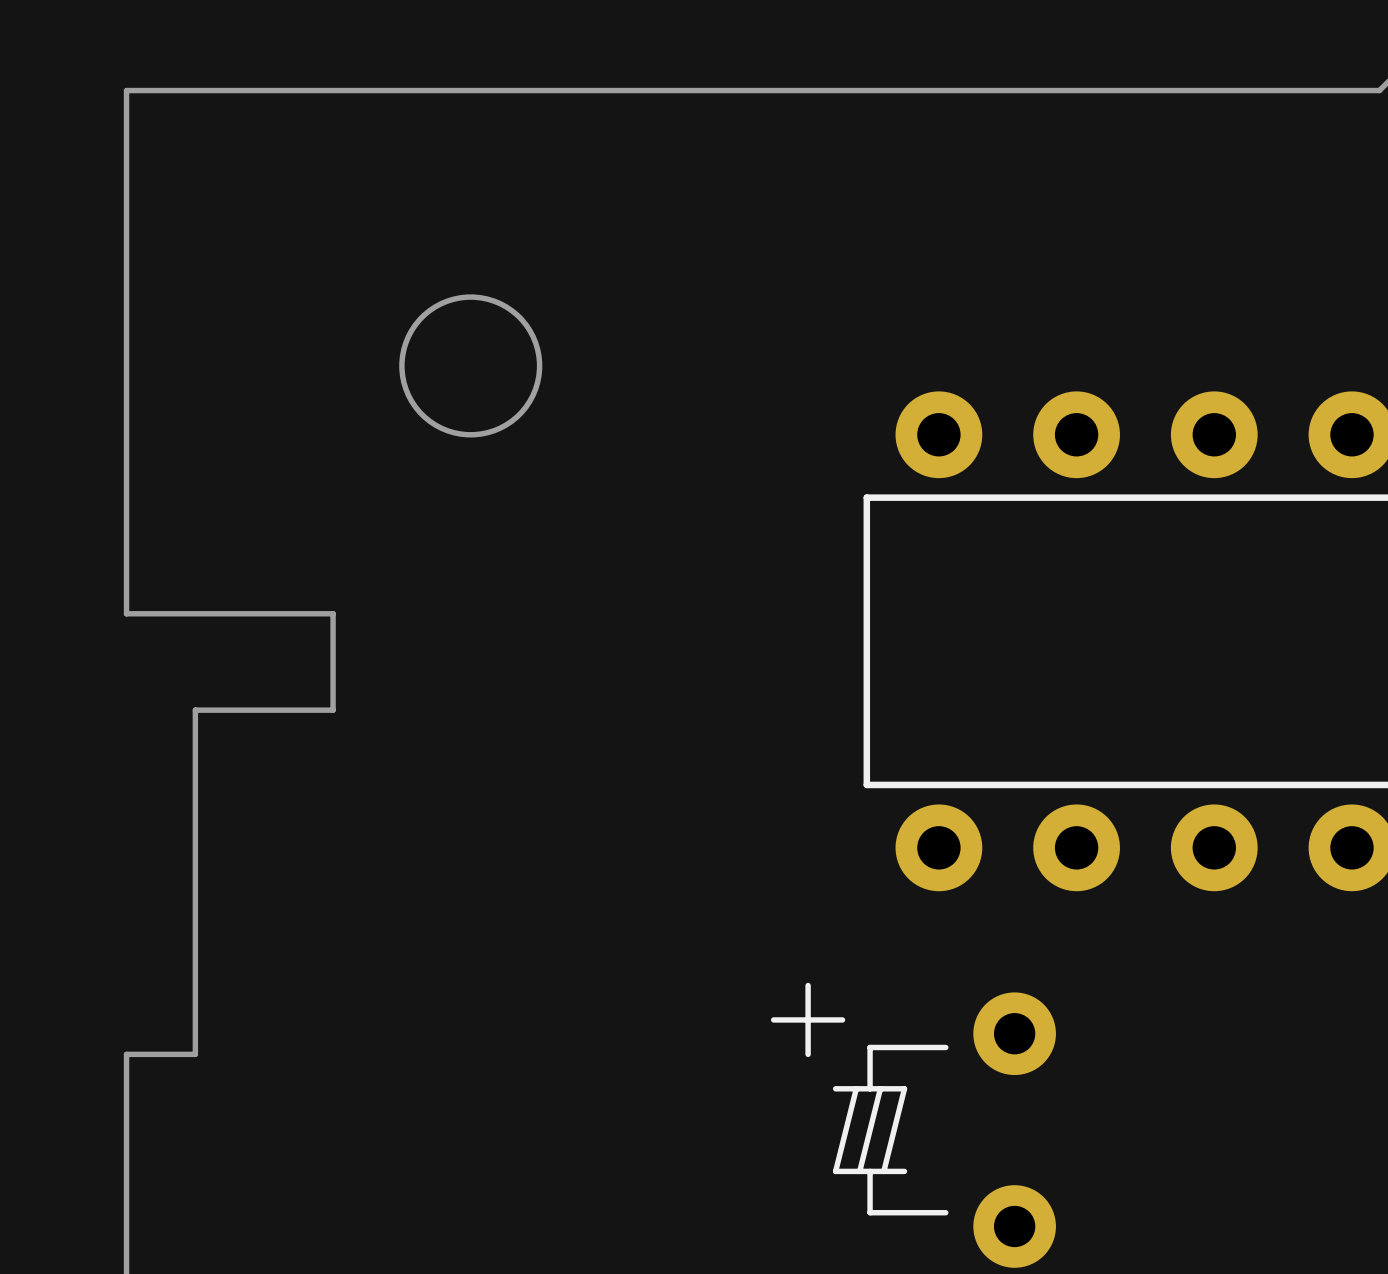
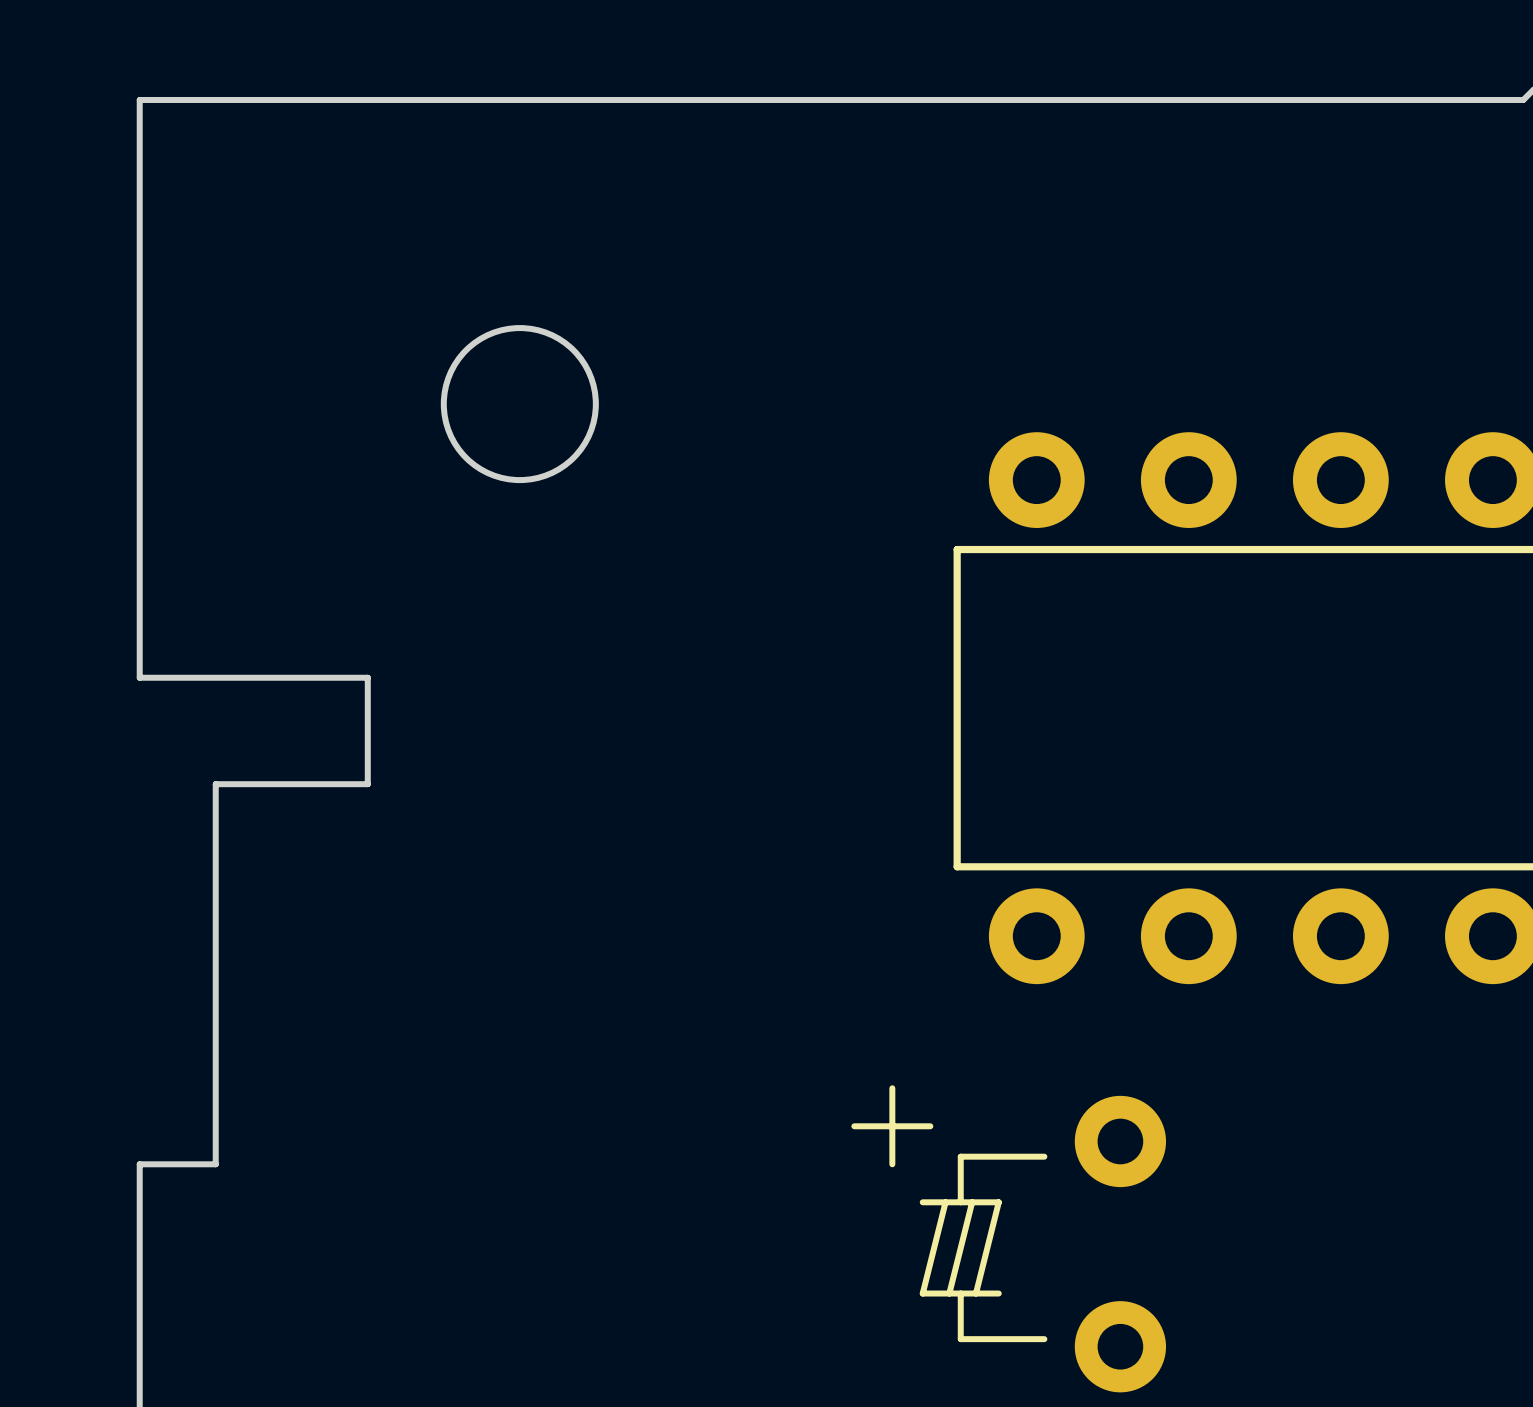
part footprint: [770, 982, 1056, 1268] -> [851, 1085, 1167, 1393]

